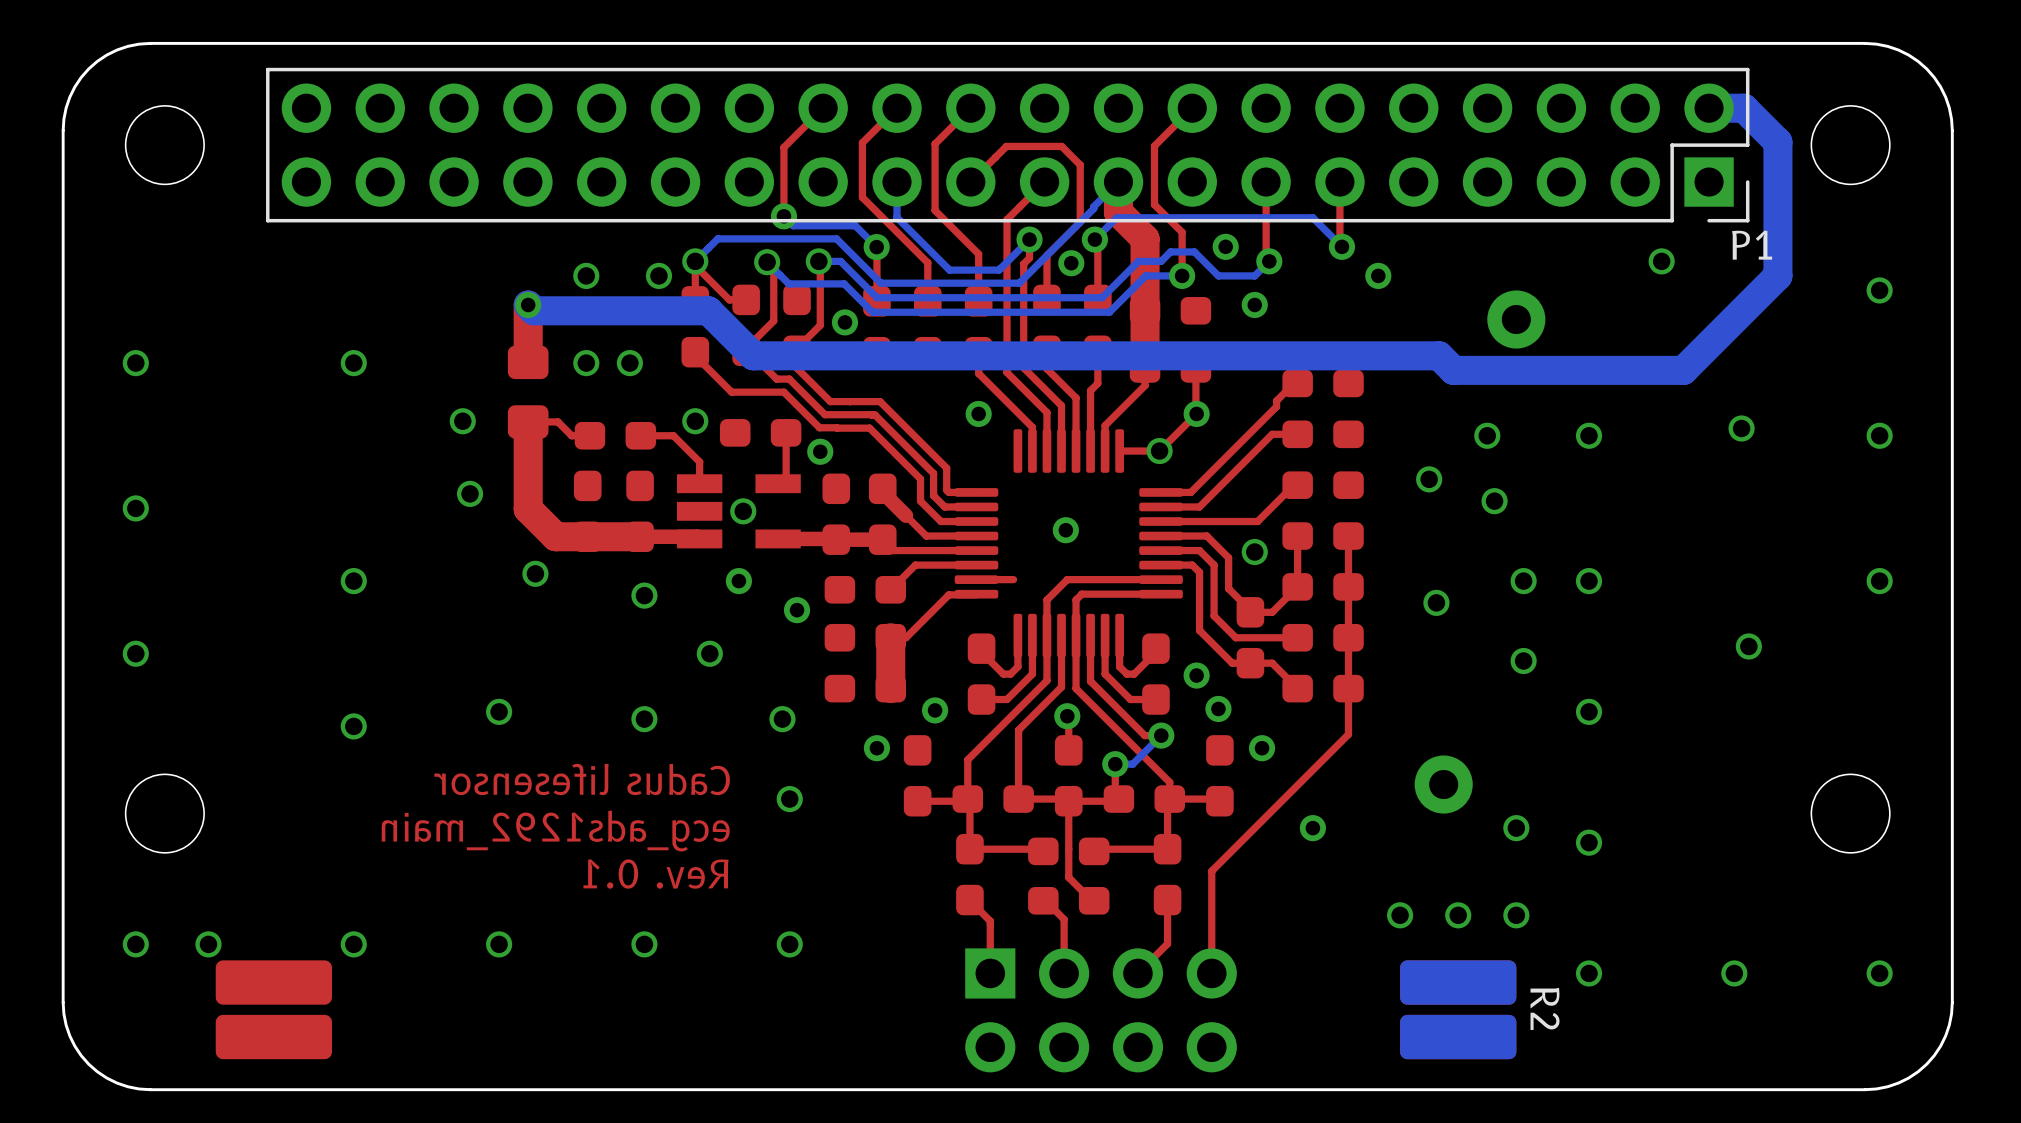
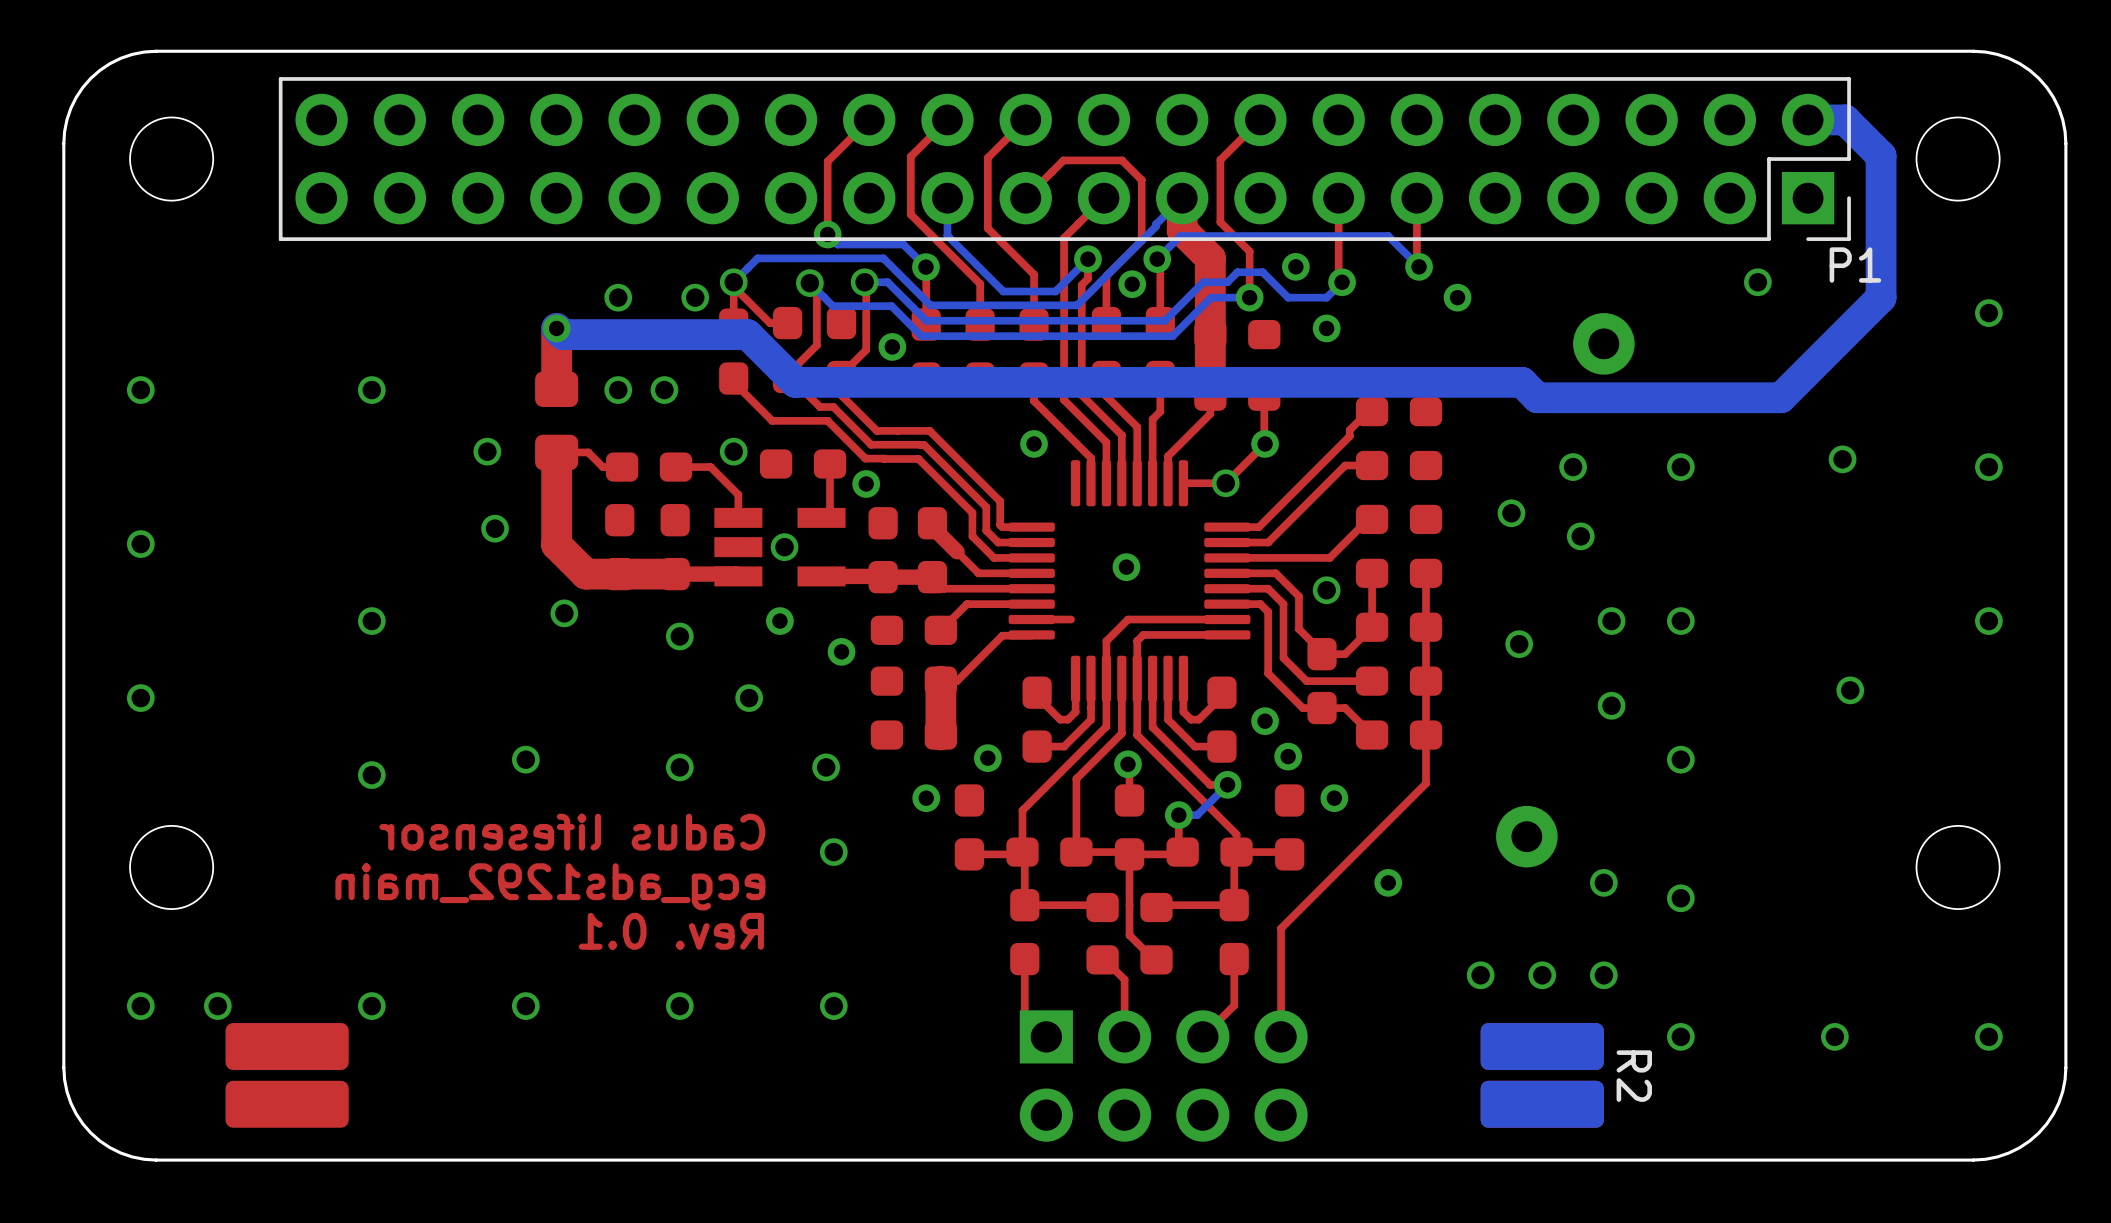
top track: (969, 900) (990, 921) (990, 973) -> (1024, 959) (1024, 1015) (1046, 1036)

